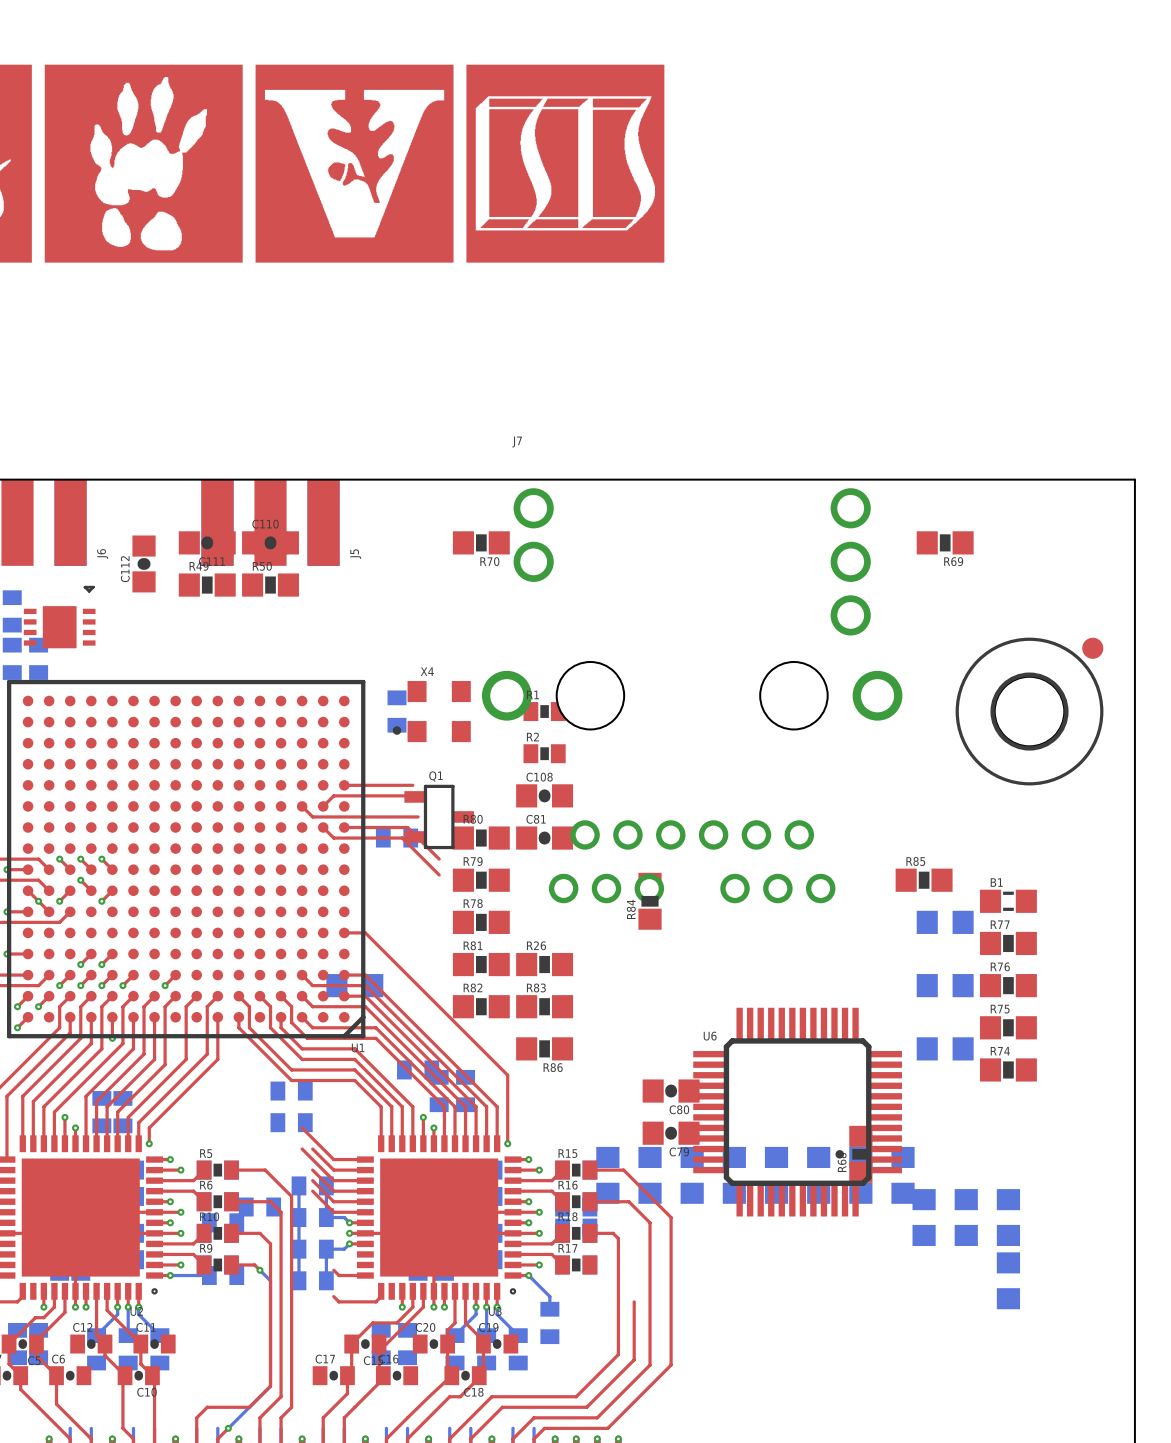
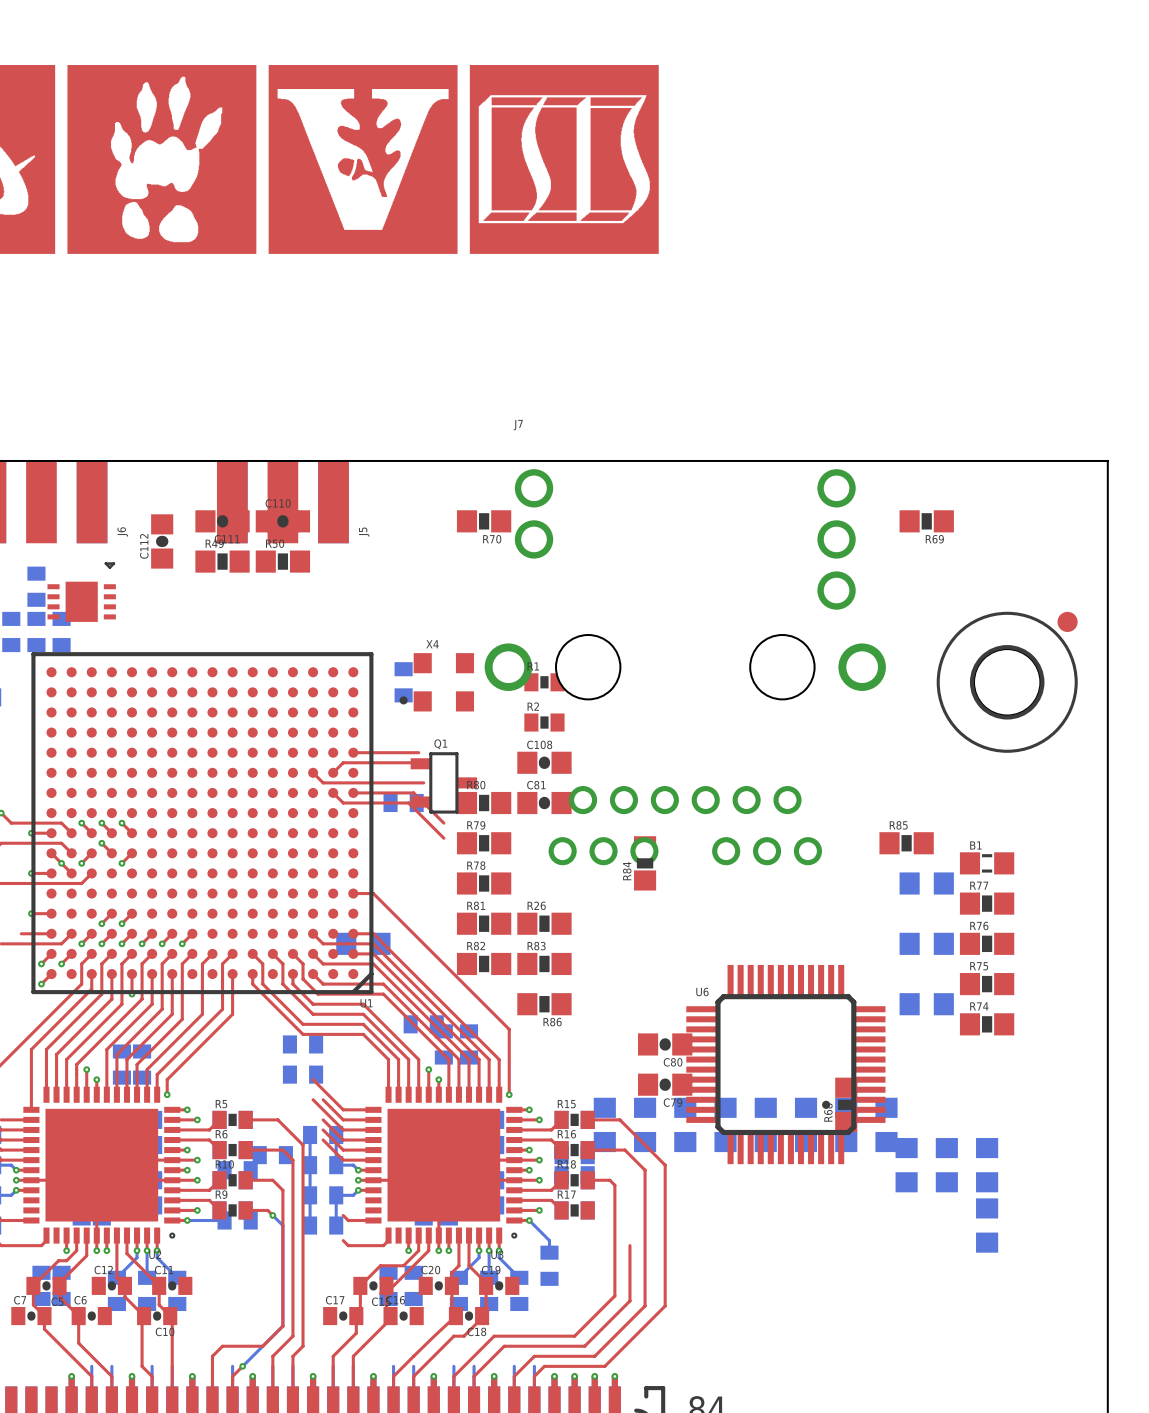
top track: none -> (172, 933) (162, 943)
via: none -> (162, 943)

